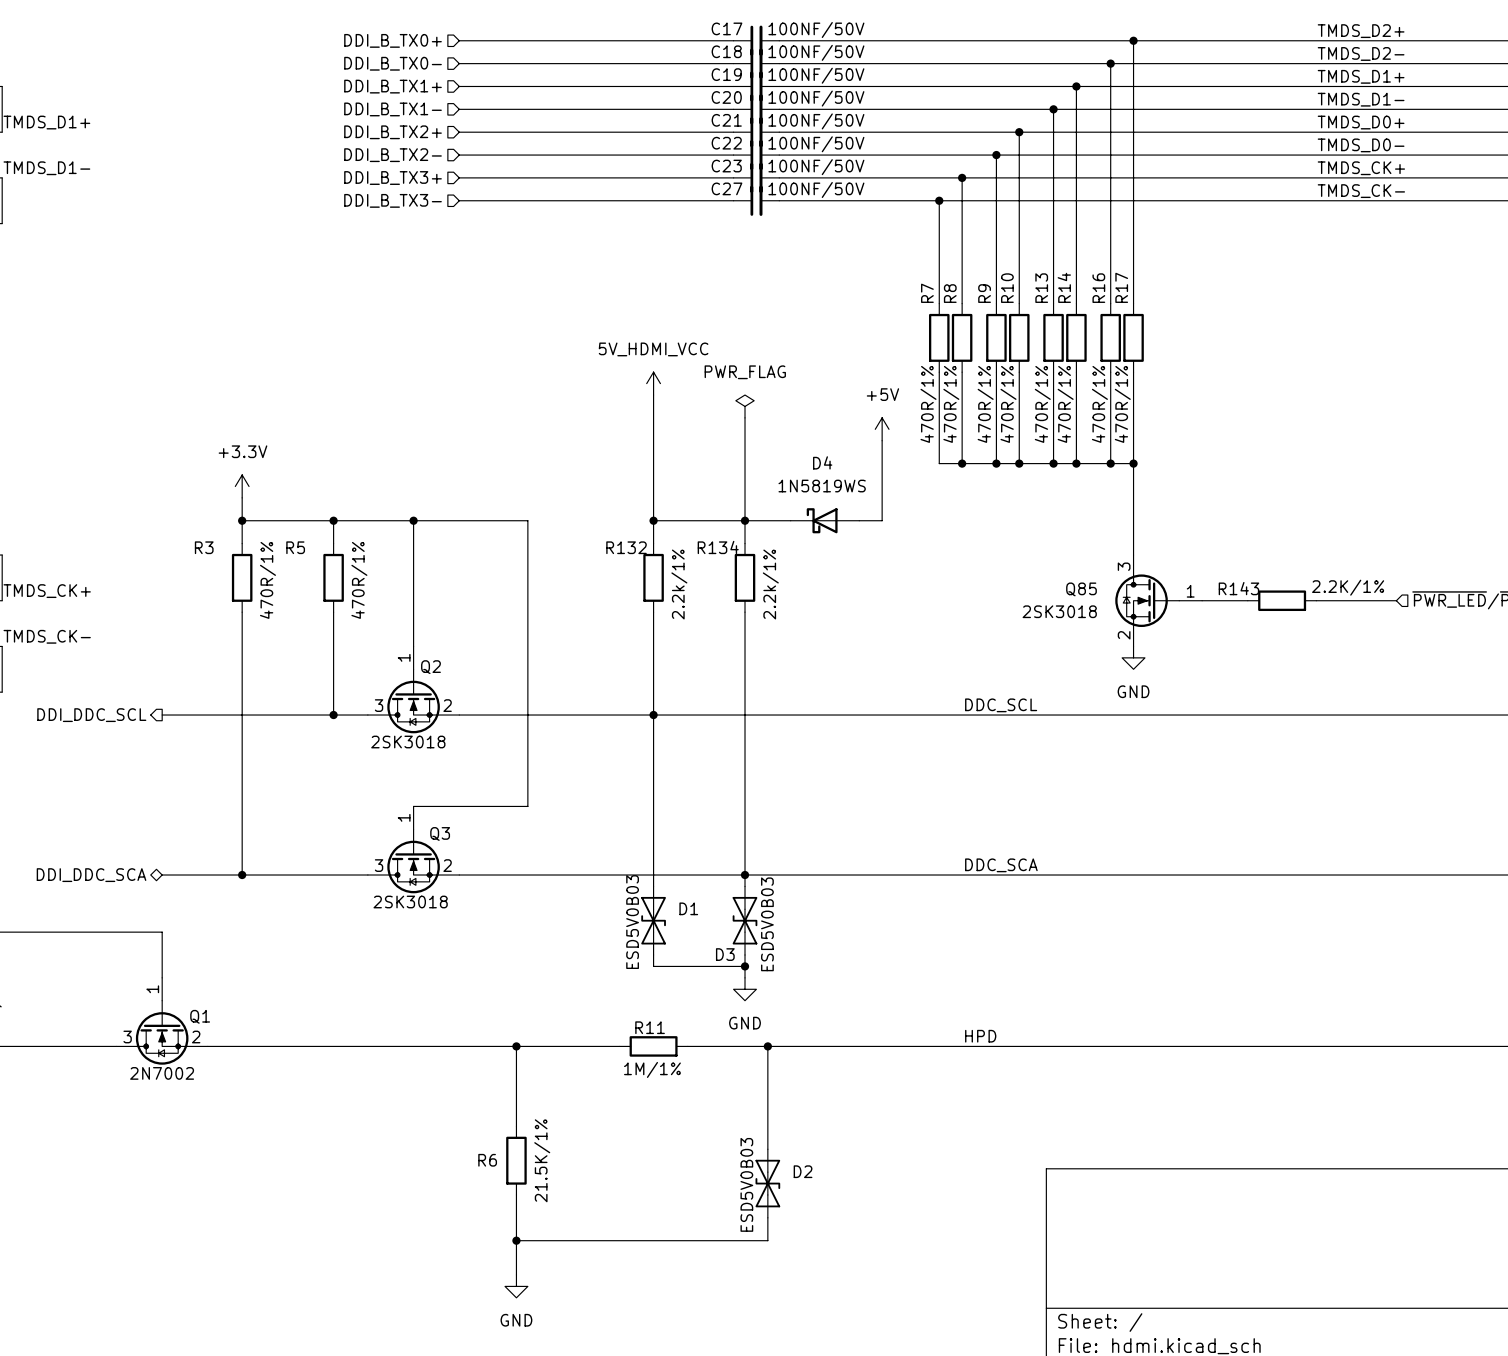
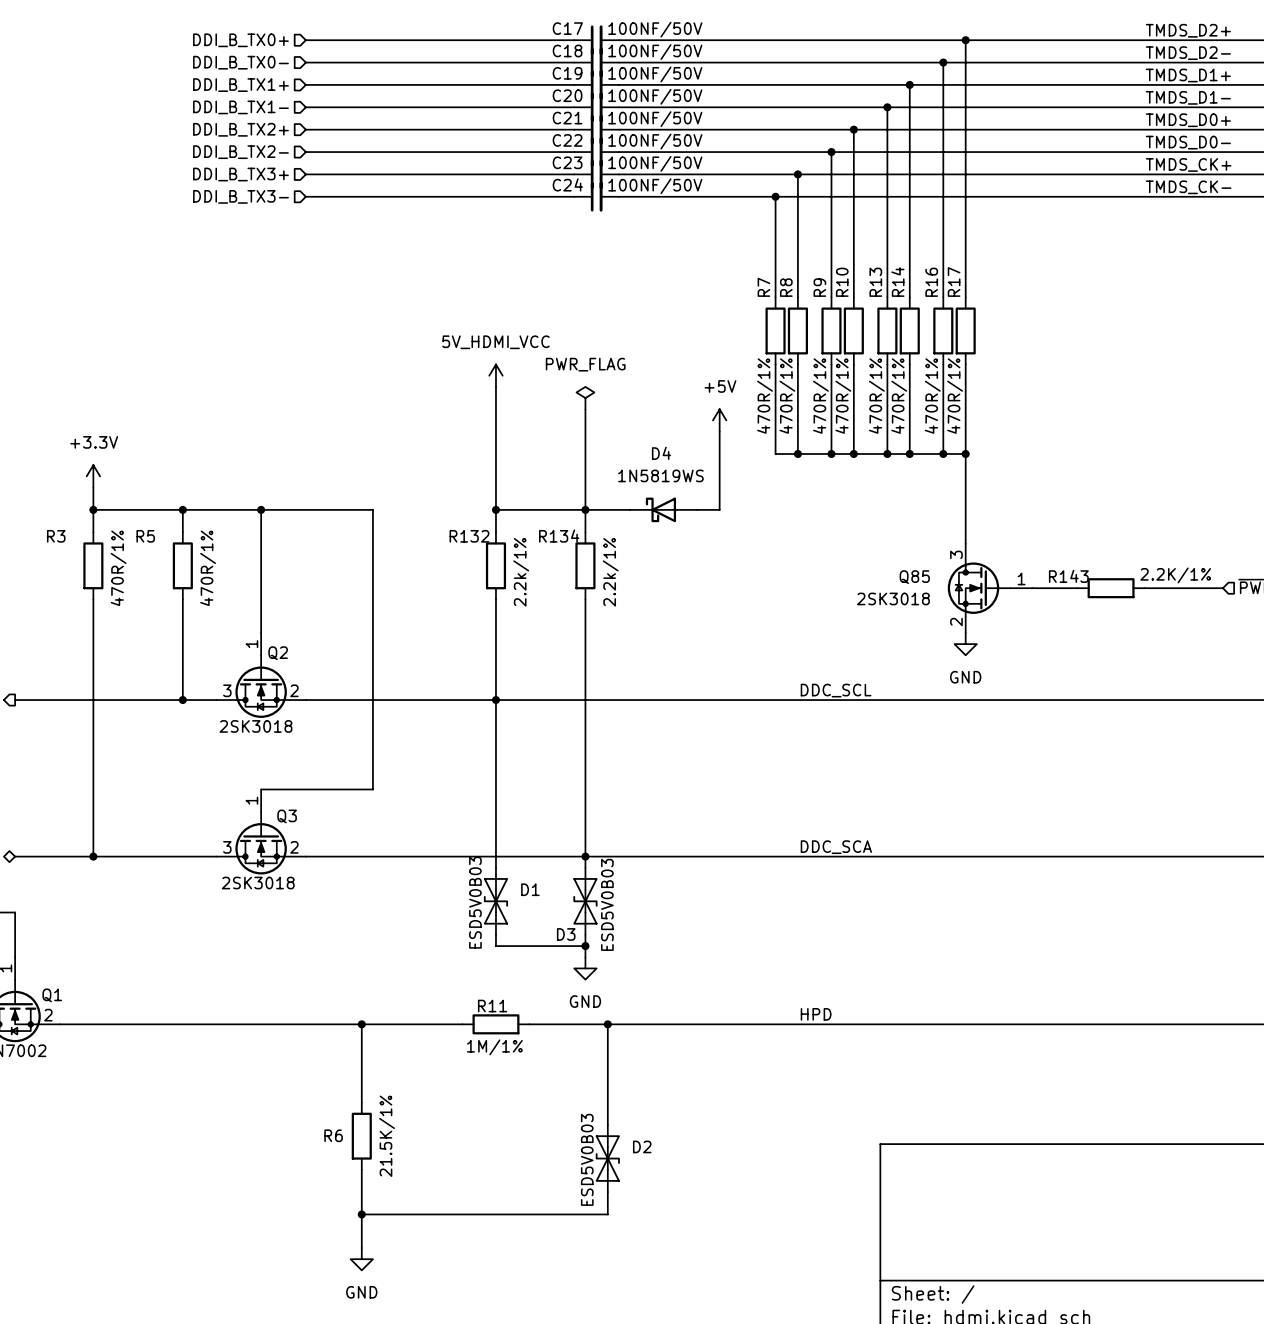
C27 name: C27 (726, 188) -> C24 (567, 184)

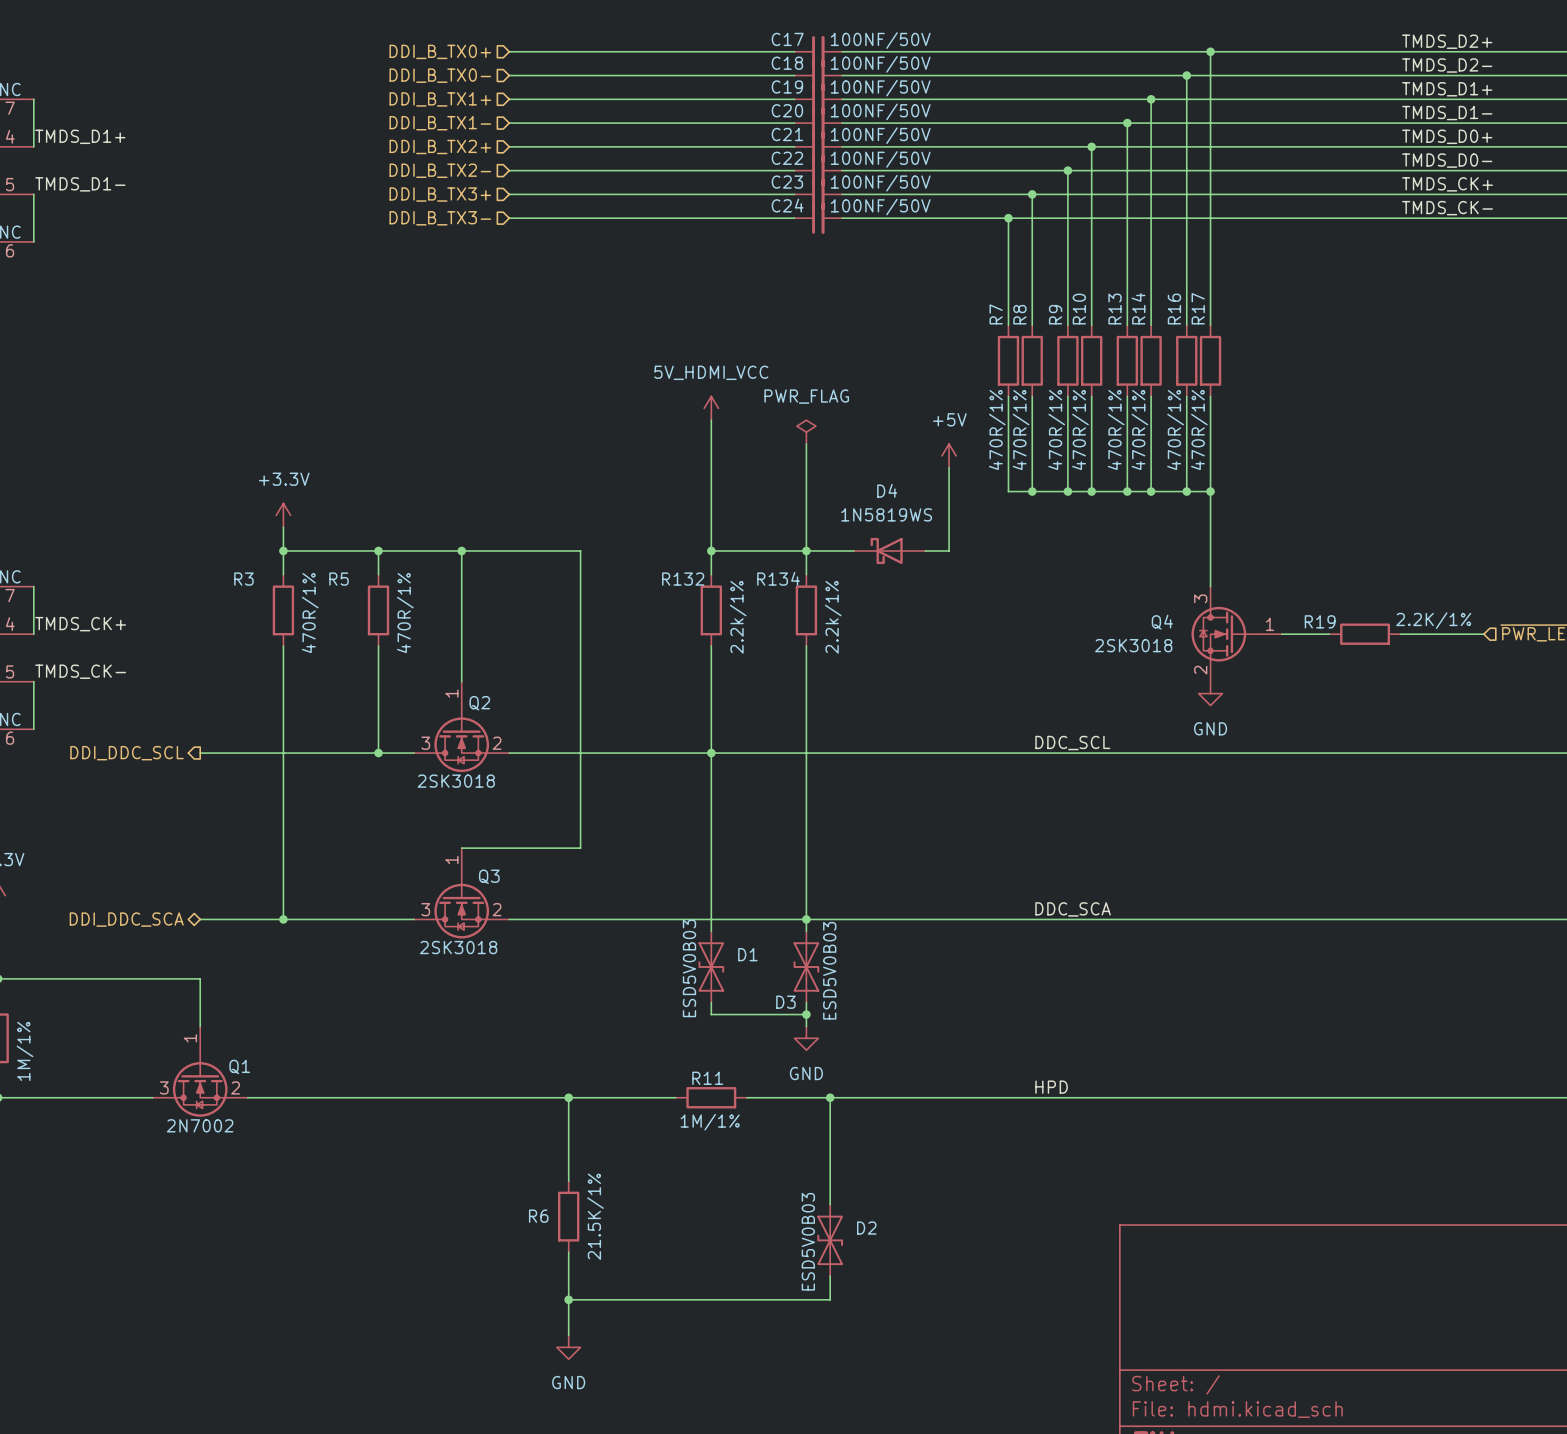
R143 name: R143 (1068, 576) -> R19 (1320, 621)
Q85 name: Q85 (914, 577) -> Q4 (1162, 622)

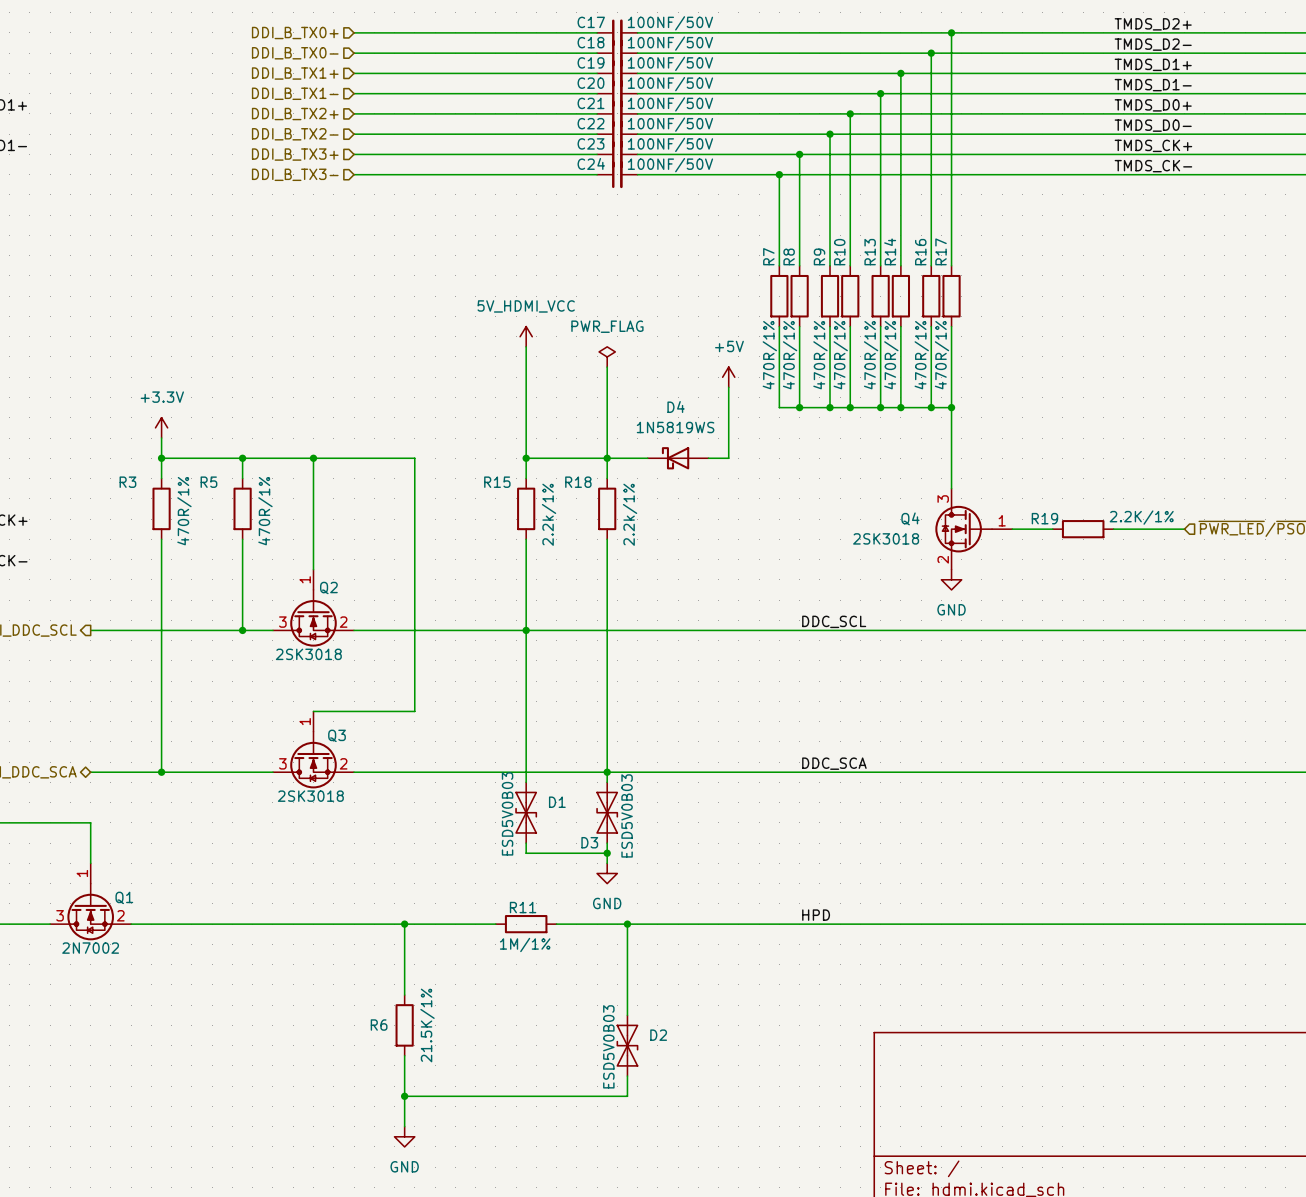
R134 name: R134 (778, 578) -> R18 (578, 482)
R132 name: R132 (683, 579) -> R15 (497, 482)

